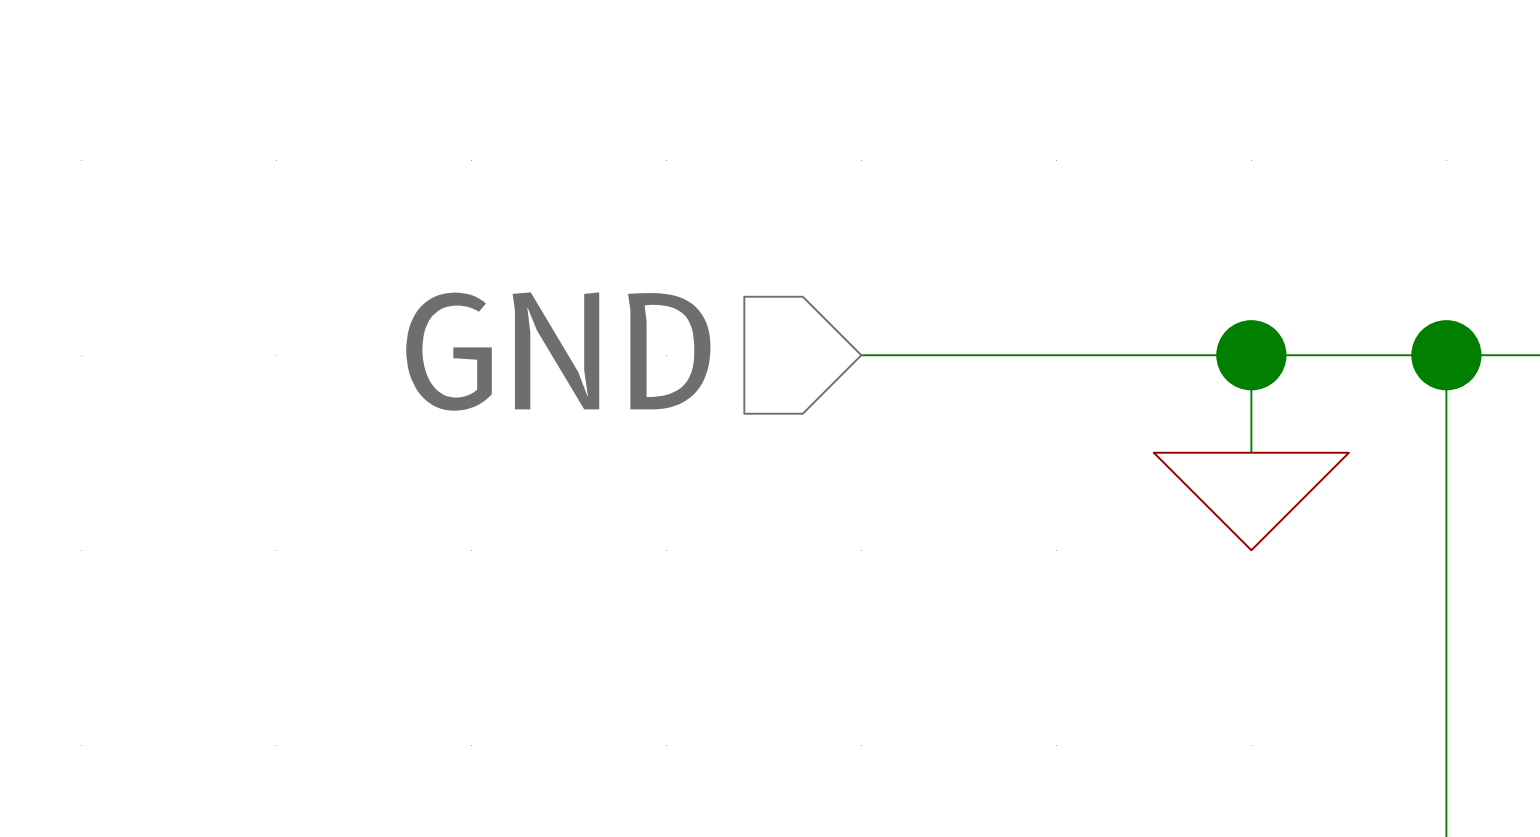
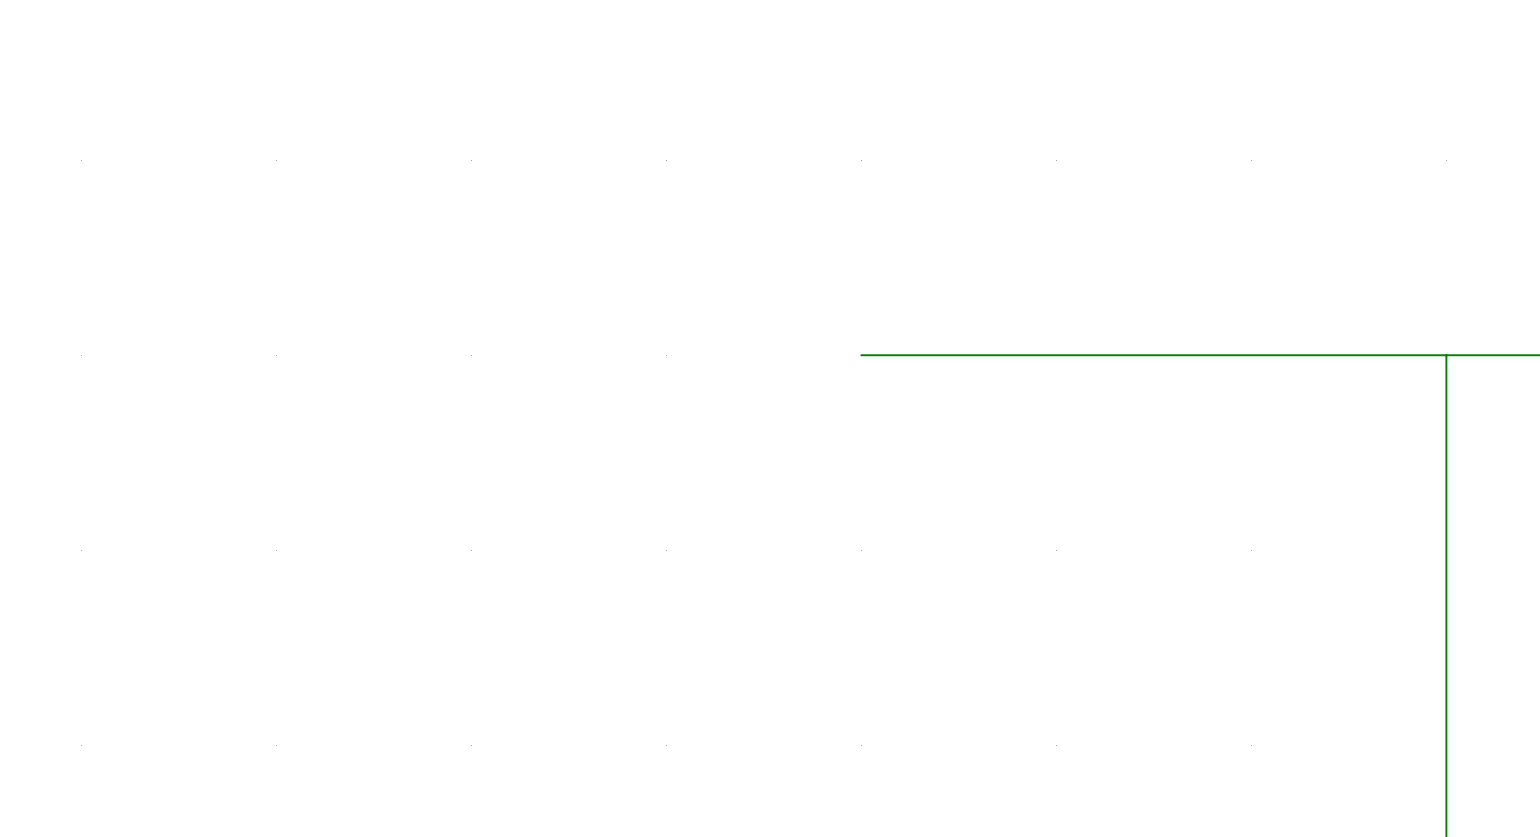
hierarchical label: GND (558, 351) -> none
wire: (1251, 355) (1251, 452) -> none
junction: (1251, 355) -> none
junction: (1446, 355) -> none
power symbol: (1251, 501) -> none

